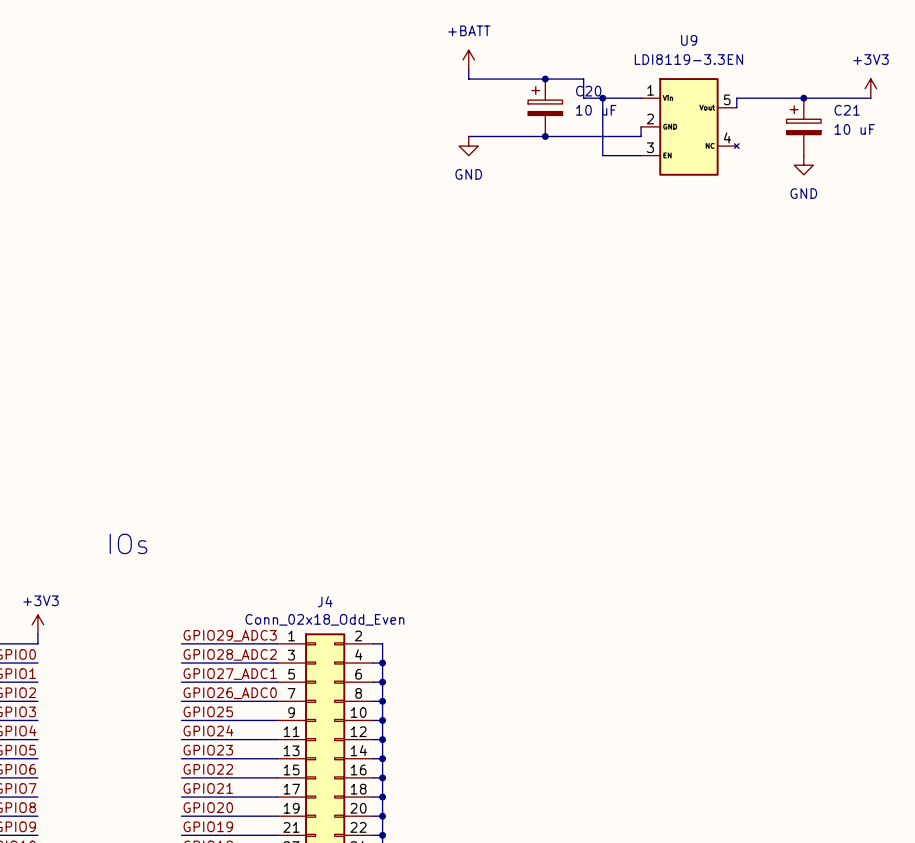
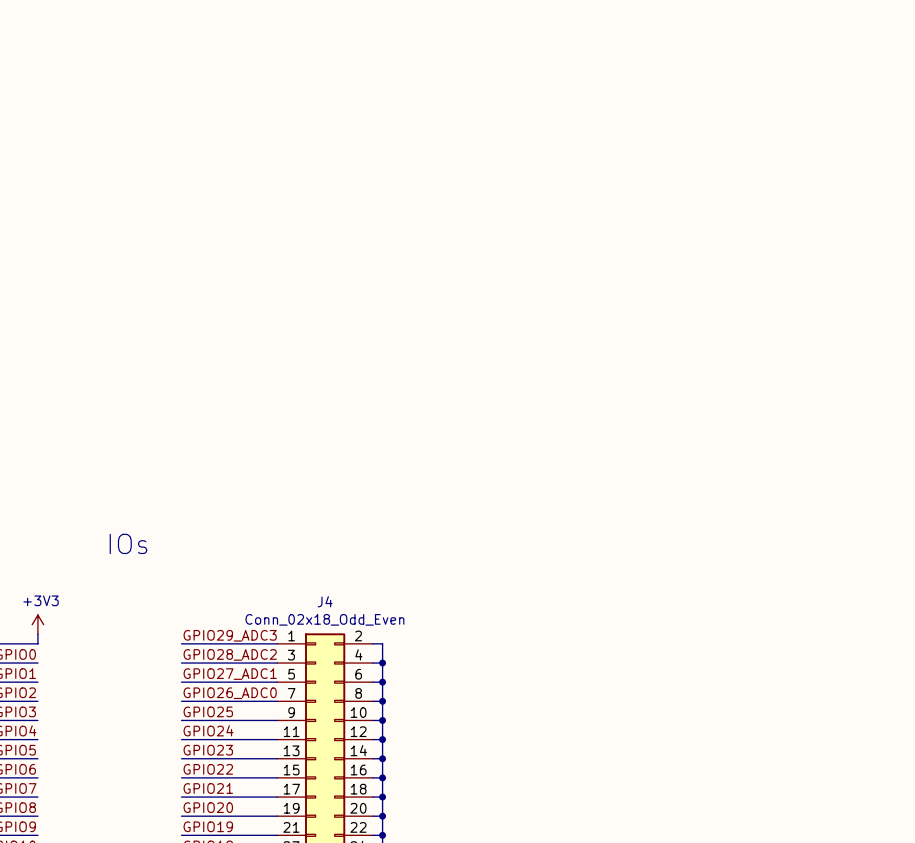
power symbol: +BATT (468, 59) -> none
wire: (468, 69) (468, 79) (583, 79) (583, 98) (641, 98) -> none
junction: (545, 79) -> none
power symbol: +3V3 (870, 88) -> none
wire: (602, 98) (602, 155) (641, 155) -> none
junction: (602, 98) -> none
junction: (803, 98) -> none
wire: (870, 98) (736, 98) (736, 107) -> none
C20: 10 uF (545, 107) -> none
wire: (641, 126) (641, 136) (468, 136) -> none
U9: LDI8119-3.3EN (690, 126) -> none
C21: 10 uF (803, 126) -> none
junction: (545, 136) -> none
power symbol: GND (468, 146) -> none
power symbol: GND (803, 165) -> none

